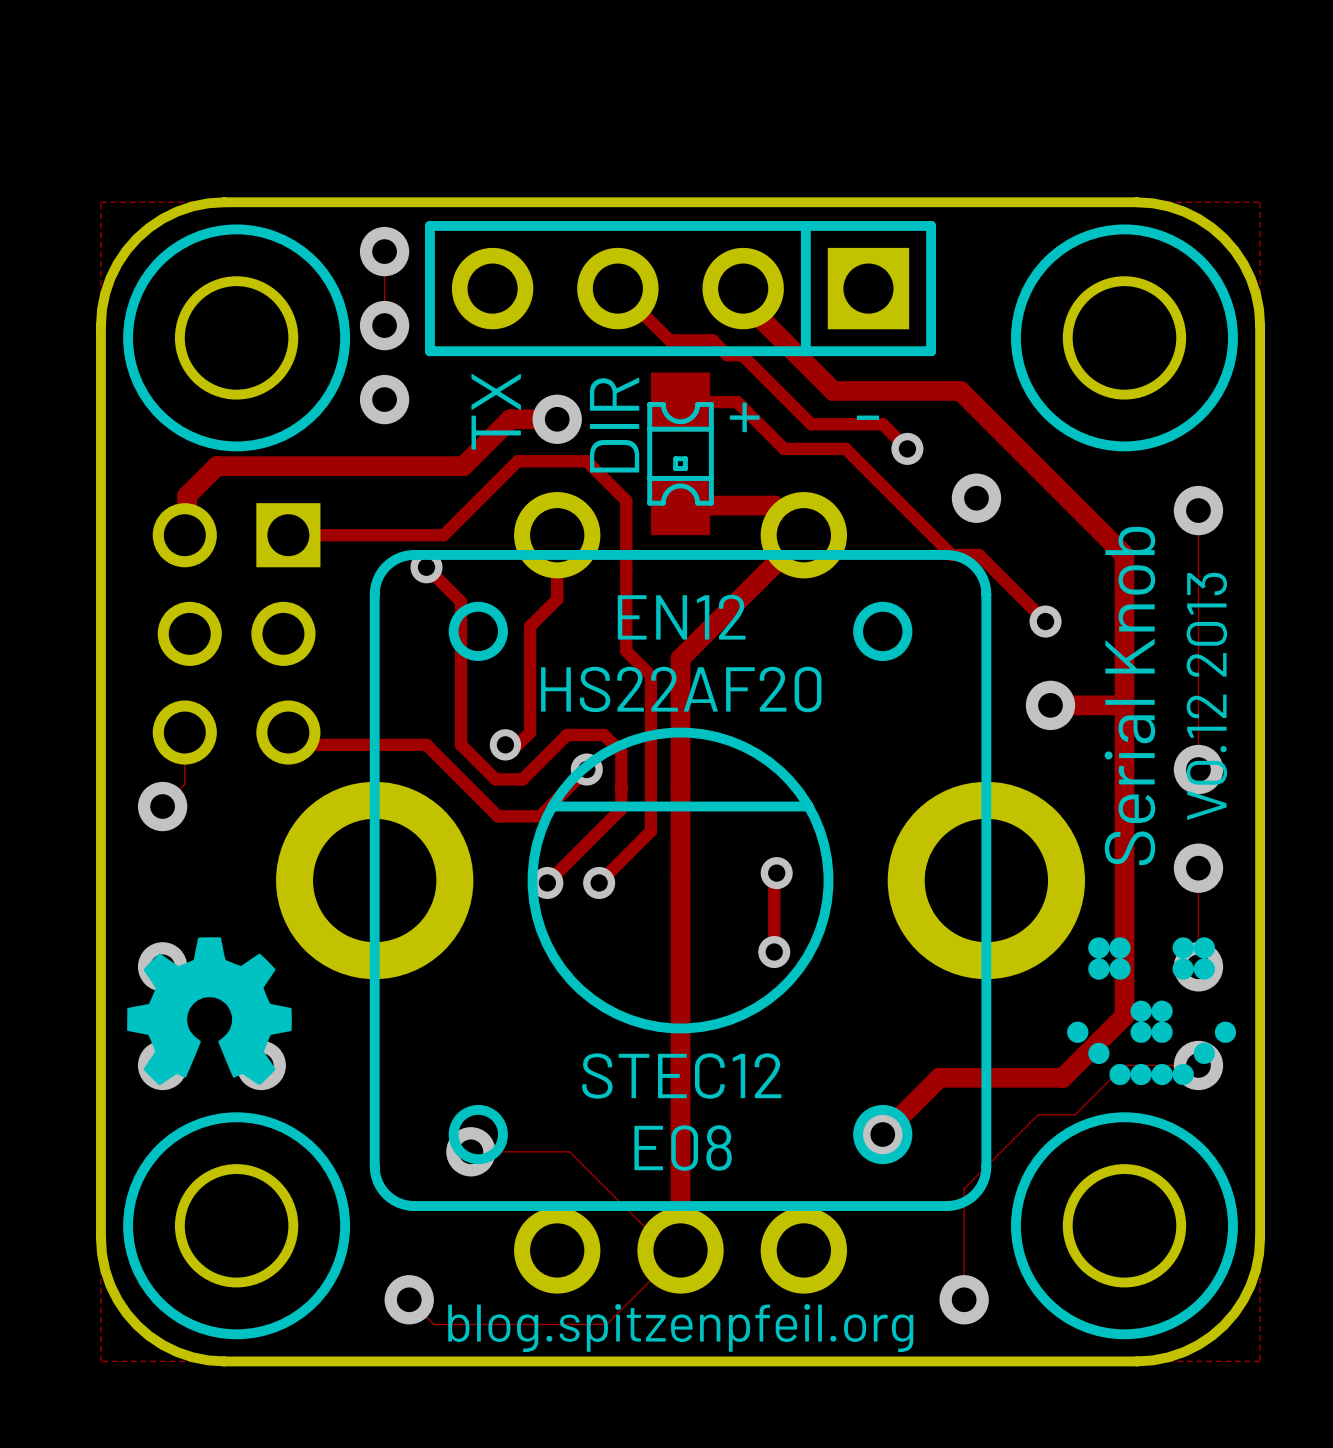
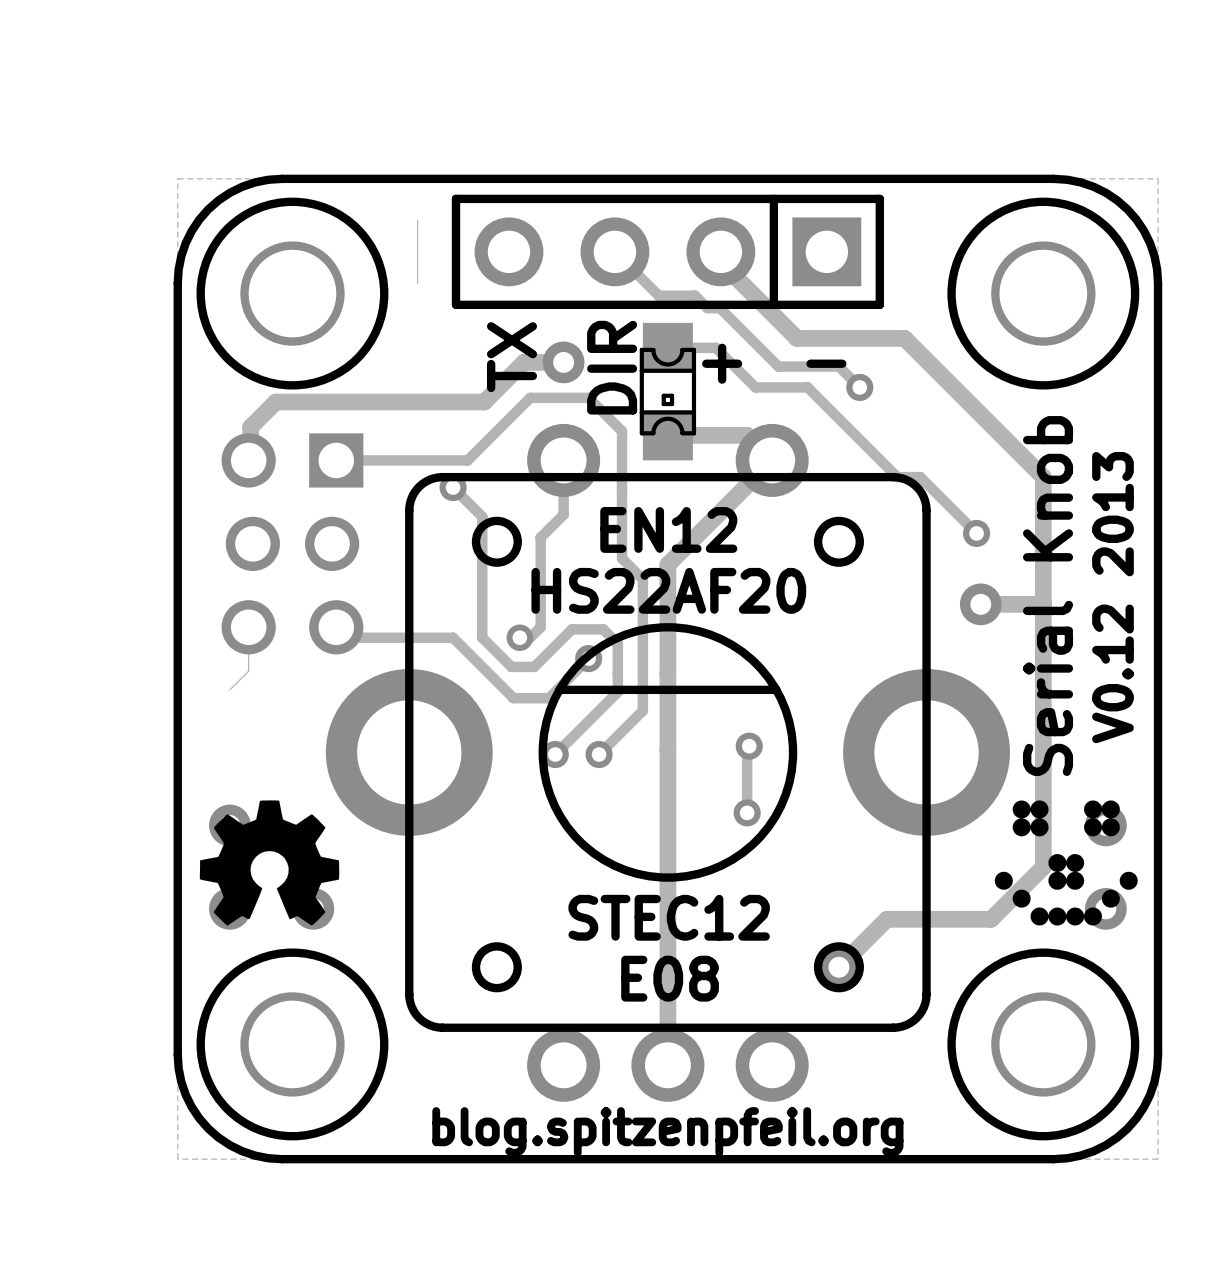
via: (384, 251) -> none
via: (384, 325) -> none
via: (384, 399) -> none
via: (976, 498) -> none
track: (1198, 510) (1198, 769) -> none
via: (1198, 510) -> none
via: (1198, 769) -> none
via: (162, 806) -> none
track: (1198, 868) (1198, 966) -> none
via: (1198, 868) -> none
track: (1198, 1065) (1124, 1065) (1075, 1114) (1038, 1114) (964, 1188) (964, 1299) -> none
track: (470, 1151) (569, 1151) (668, 1250) (680, 1250) (606, 1324) (433, 1324) (409, 1299) -> none
via: (470, 1151) -> none
via: (409, 1299) -> none
via: (964, 1299) -> none

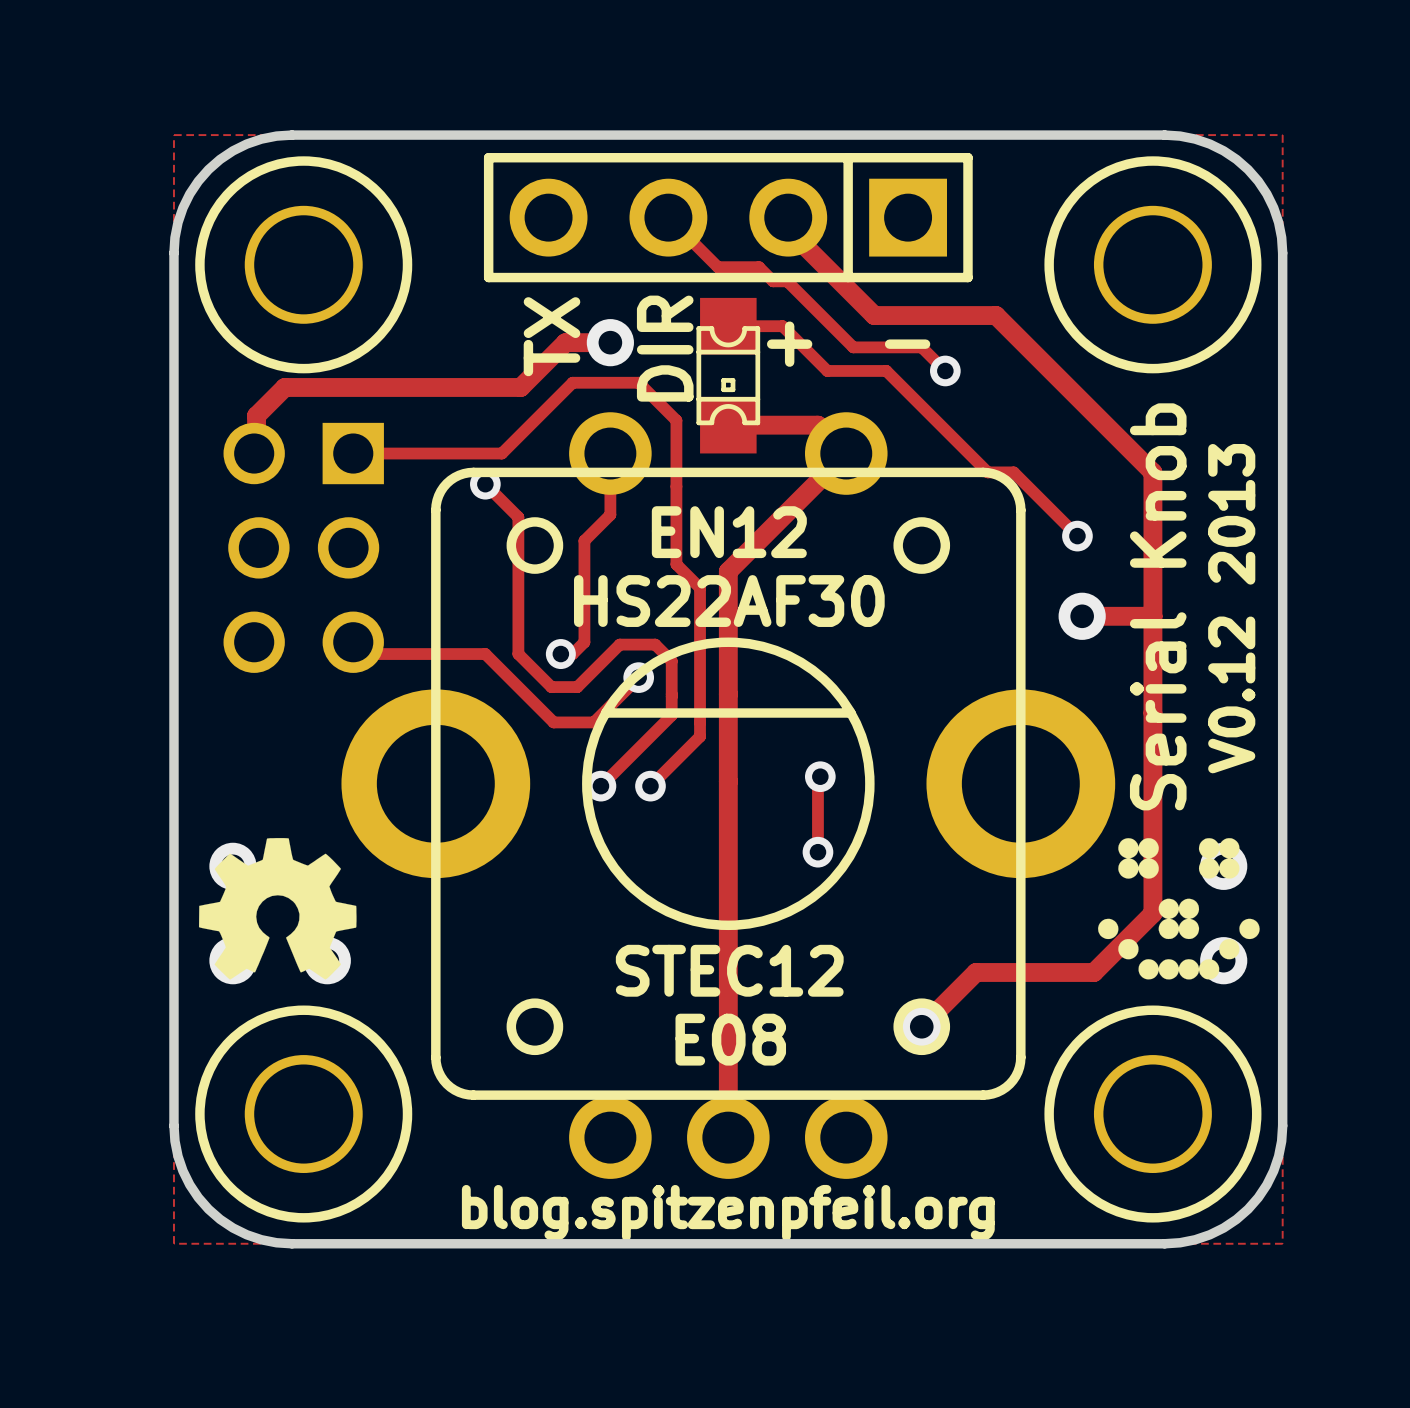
track: (417, 220) (417, 283) -> none
text: HS22AF20 (668, 590) -> HS22AF30 (729, 601)
track: (248, 627) (248, 671) (229, 689) -> none

